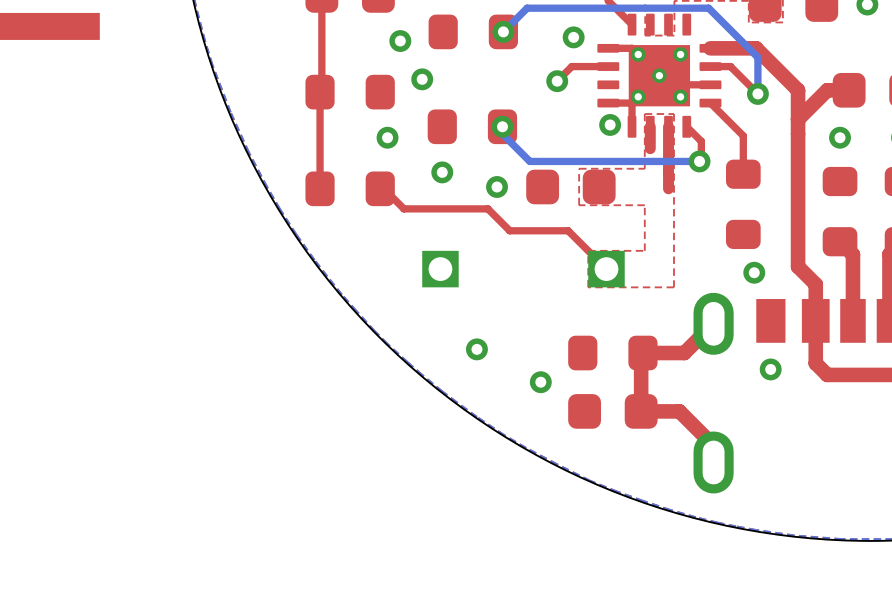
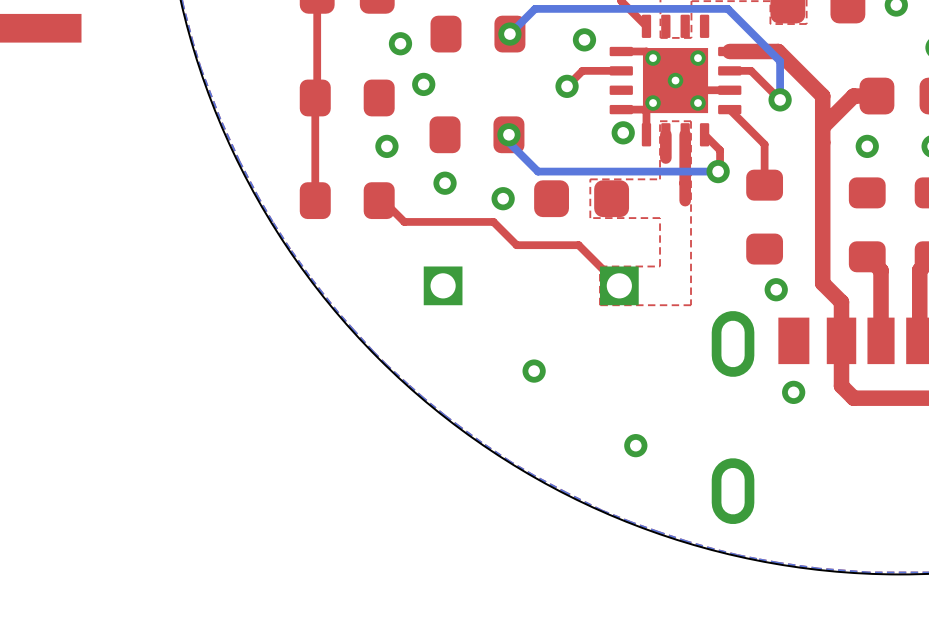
top track: (713, 323) (684, 353) (642, 353) (641, 354) (641, 411) (679, 411) (713, 445) -> none
via: (476, 349) -> none
via: none -> (534, 371)
part: (612, 353) -> none
via: (540, 382) -> none
part: (612, 411) -> none
via: none -> (635, 445)

